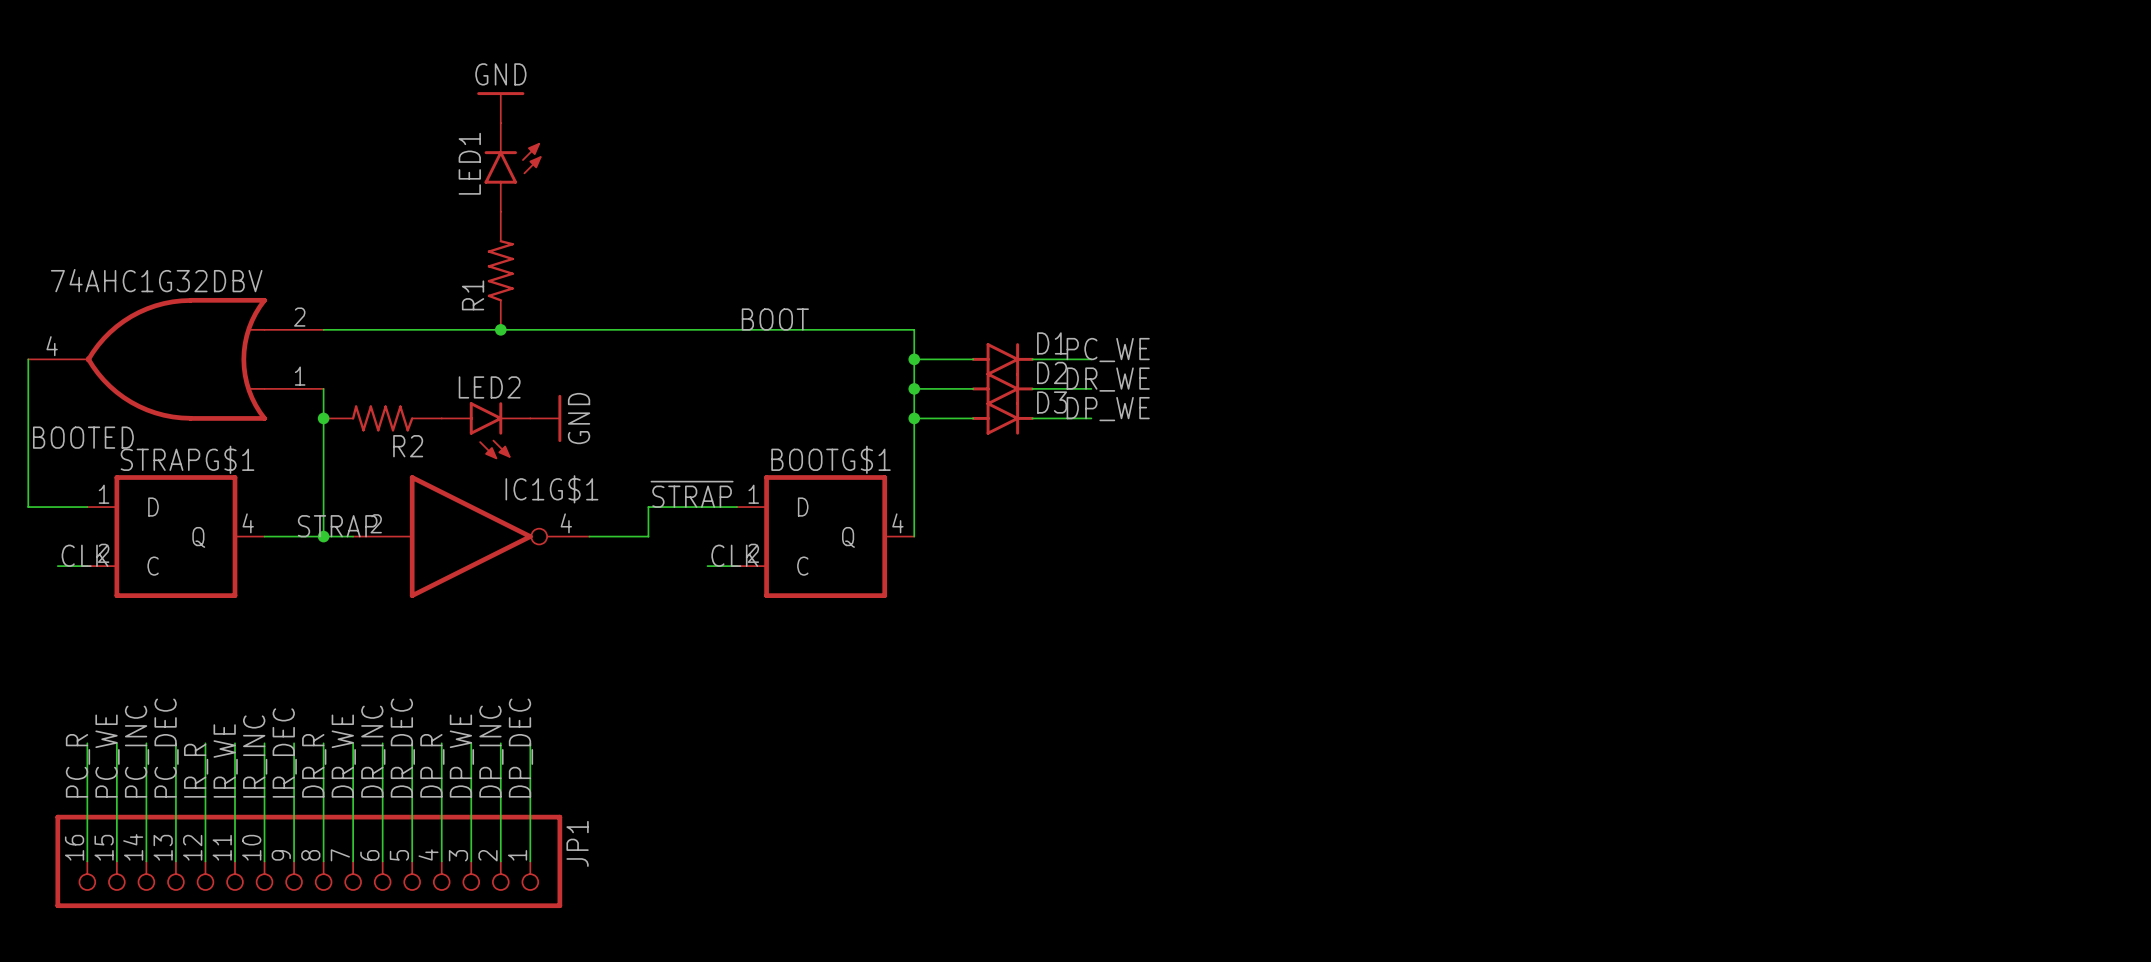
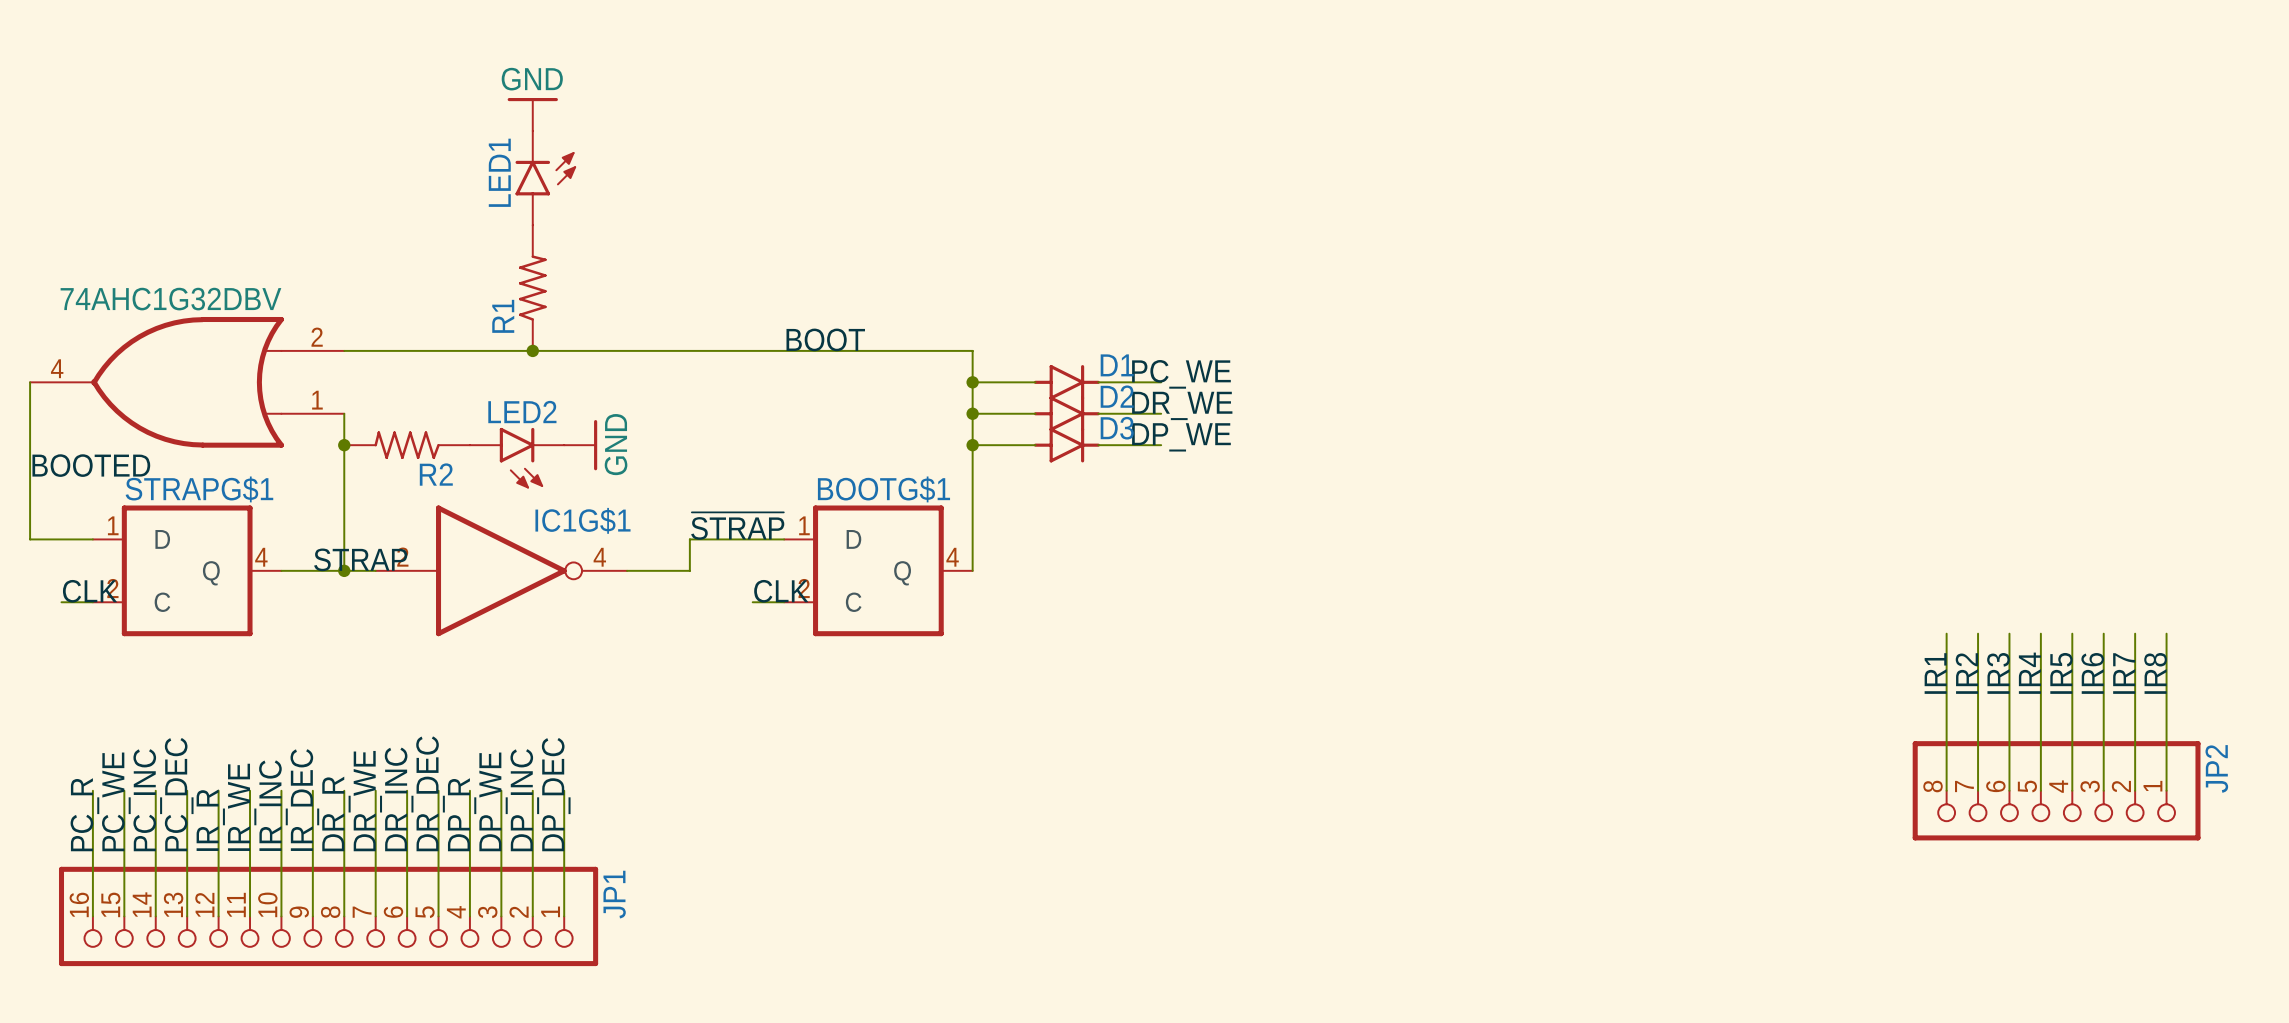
wire: none -> (1946, 633) (1946, 790)
wire: none -> (1978, 633) (1978, 790)
wire: none -> (2009, 633) (2009, 790)
wire: none -> (2040, 633) (2040, 790)
wire: none -> (2072, 633) (2072, 790)
wire: none -> (2103, 633) (2103, 790)
wire: none -> (2135, 633) (2135, 790)
wire: none -> (2166, 633) (2166, 790)
label: none -> IR1 (1935, 673)
label: none -> IR2 (1966, 673)
label: none -> IR3 (1998, 673)
label: none -> IR4 (2029, 673)
label: none -> IR5 (2061, 673)
label: none -> IR6 (2092, 673)
label: none -> IR7 (2124, 673)
label: none -> IR8 (2155, 673)
JP2: none -> (2056, 790)

